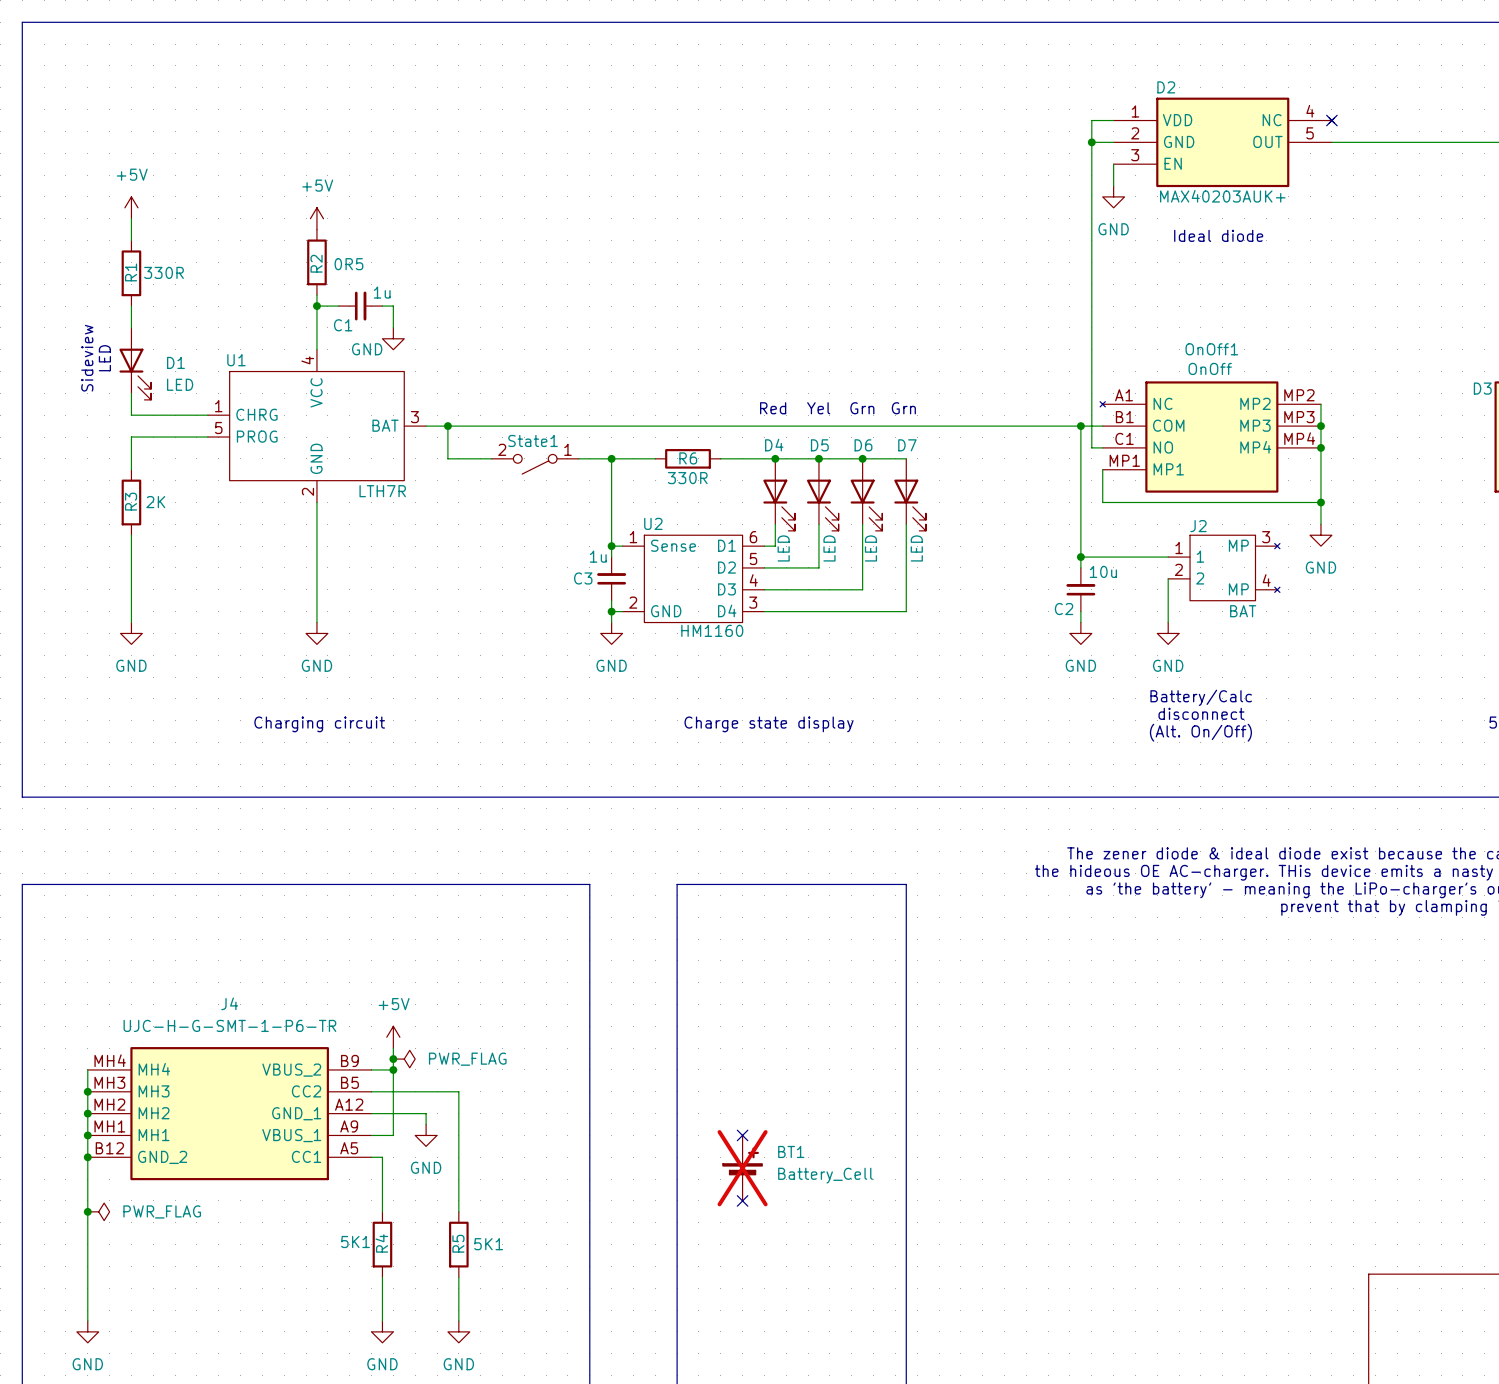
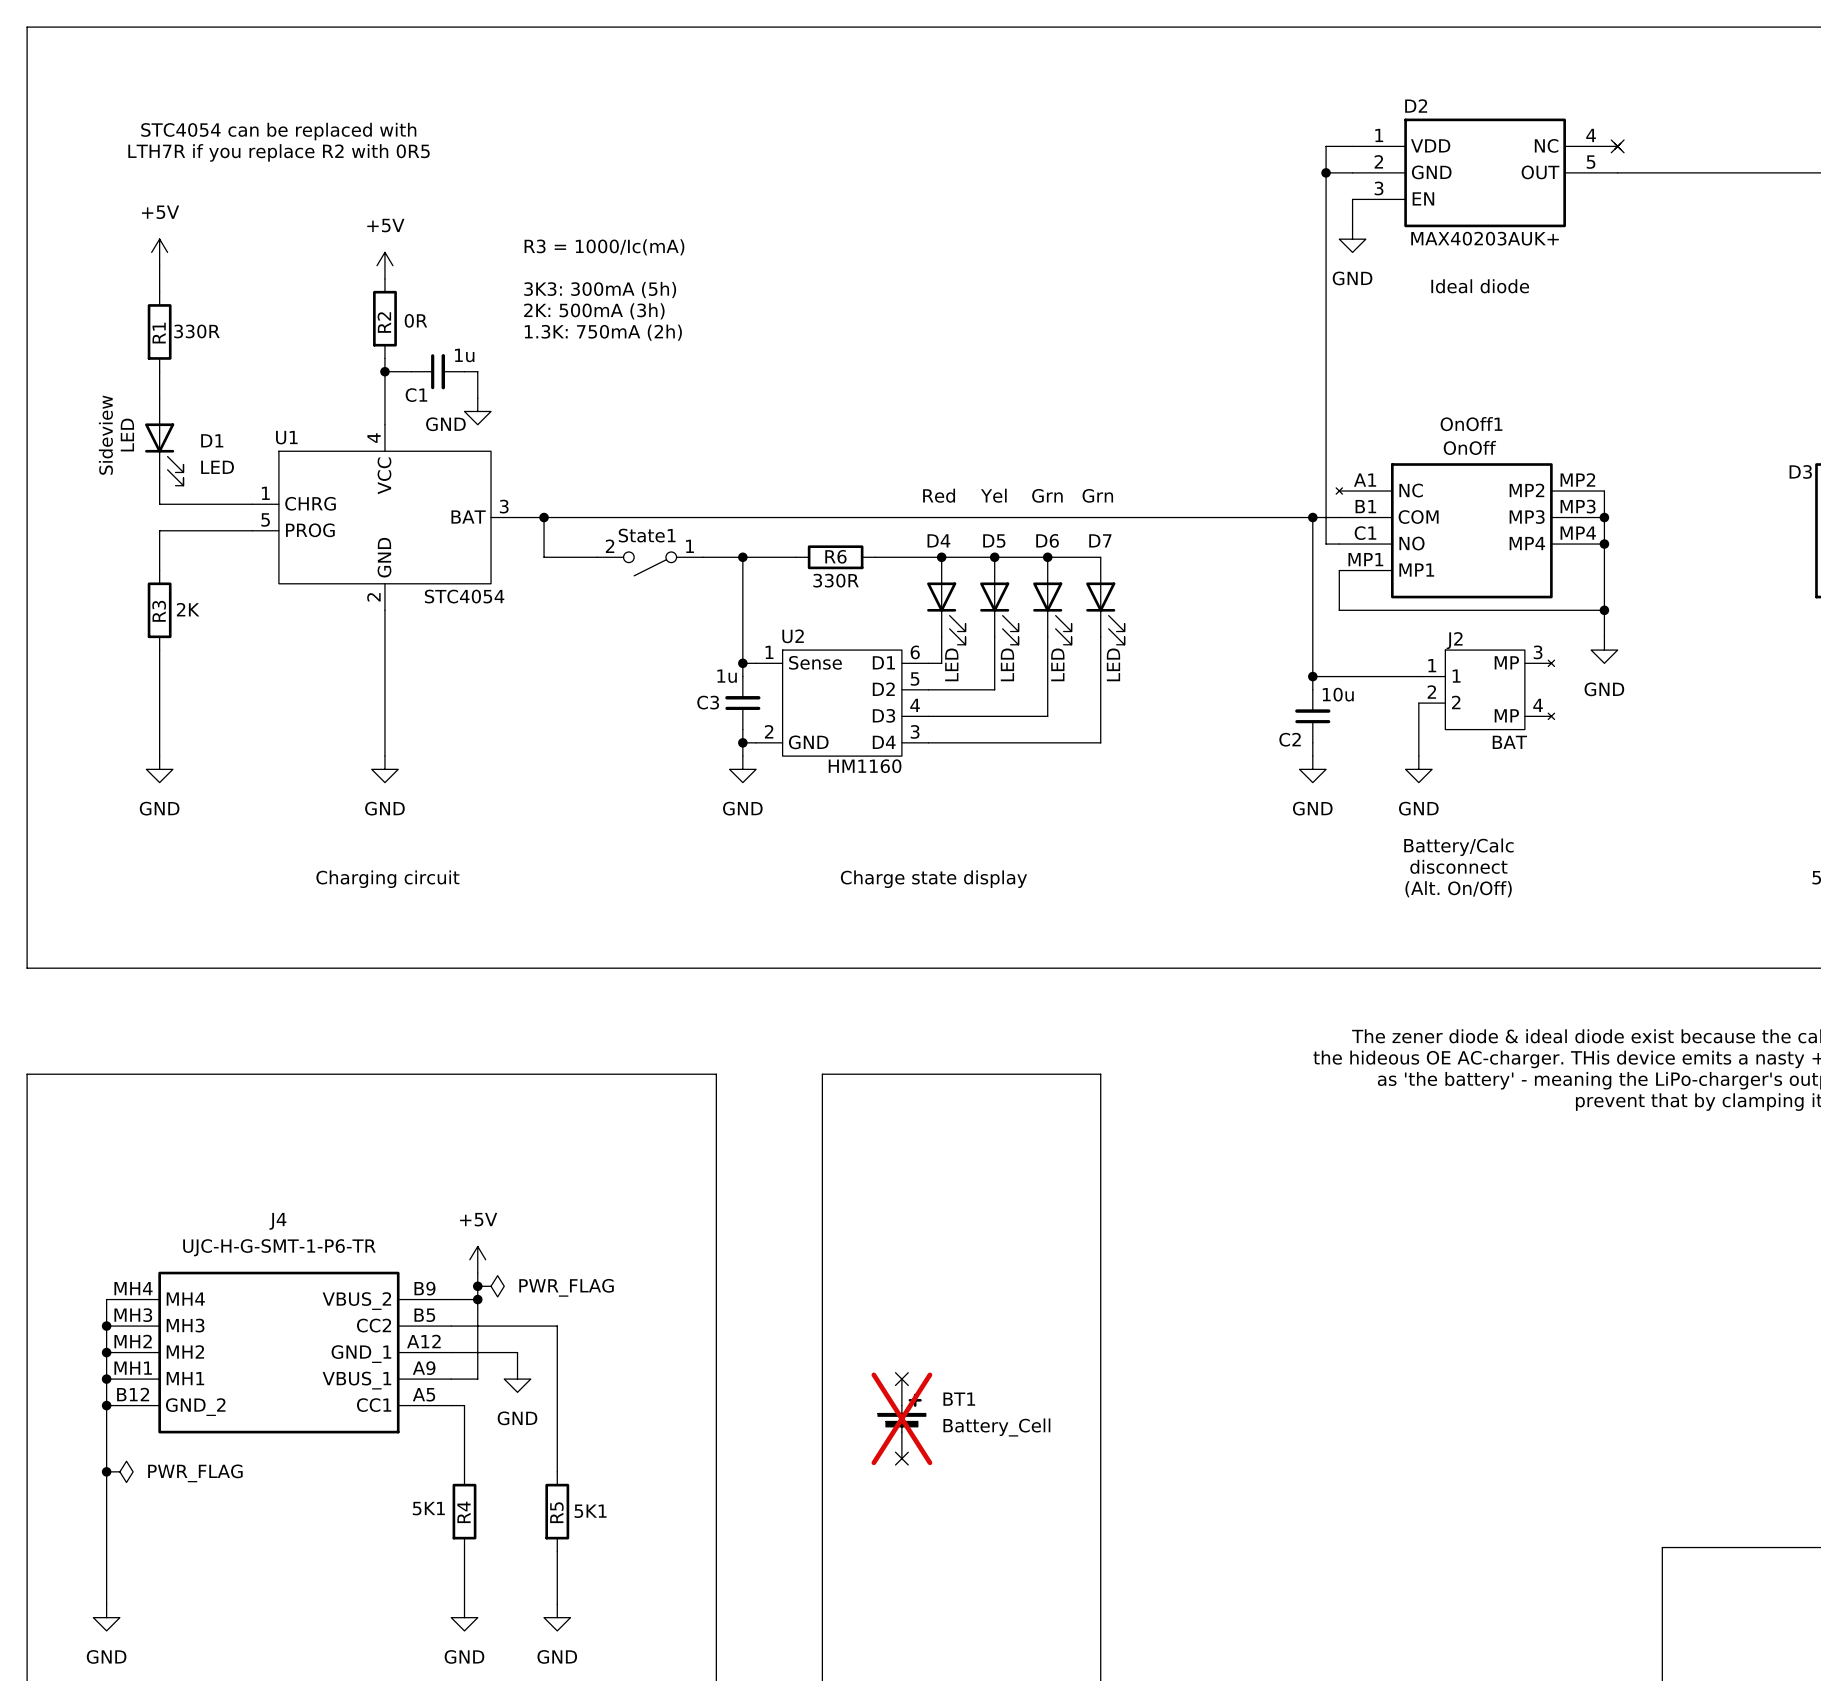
text: none -> STC4054 can be replaced with (278, 131)
text: none -> LTH7R if you replace R2 with 0R5 (279, 152)
text: none -> R3 = 1000/Ic(mA) (604, 247)
text: none -> 3K3: 300mA (5h) (600, 290)
text: none -> 2K: 500mA (3h) (594, 311)
R2 value: 0R5 (348, 264) -> 0R (415, 320)
text: none -> 1.3K: 750mA (2h) (603, 332)
U1 value: LTH7R (382, 491) -> STC4054 (464, 596)

